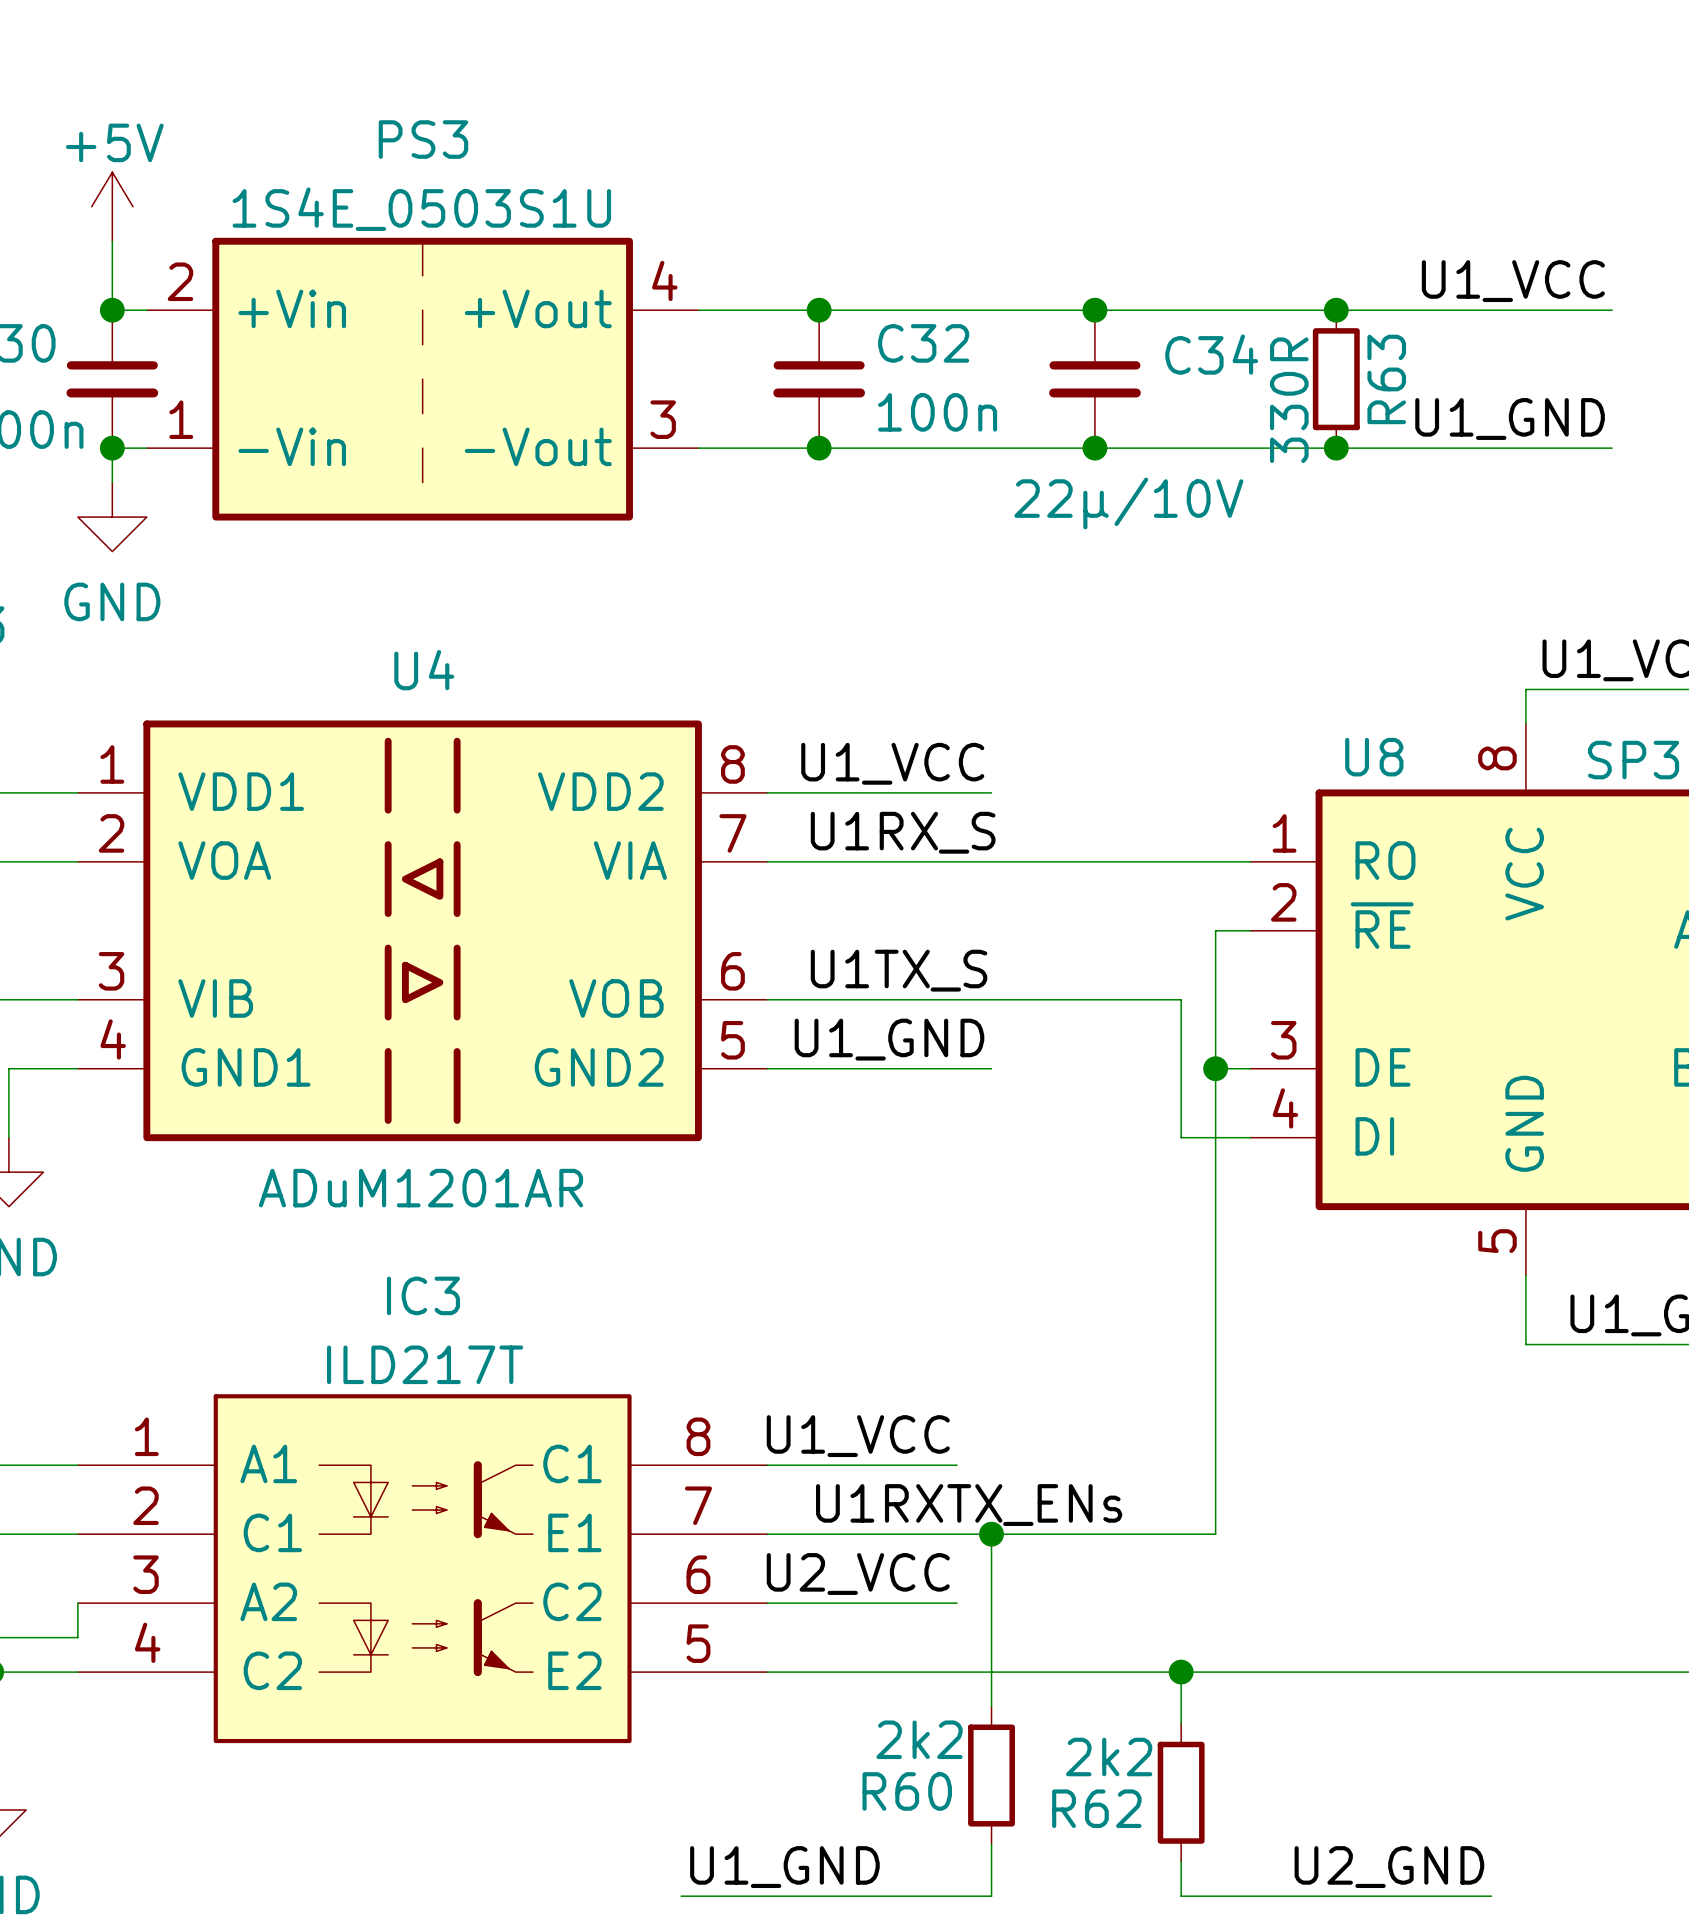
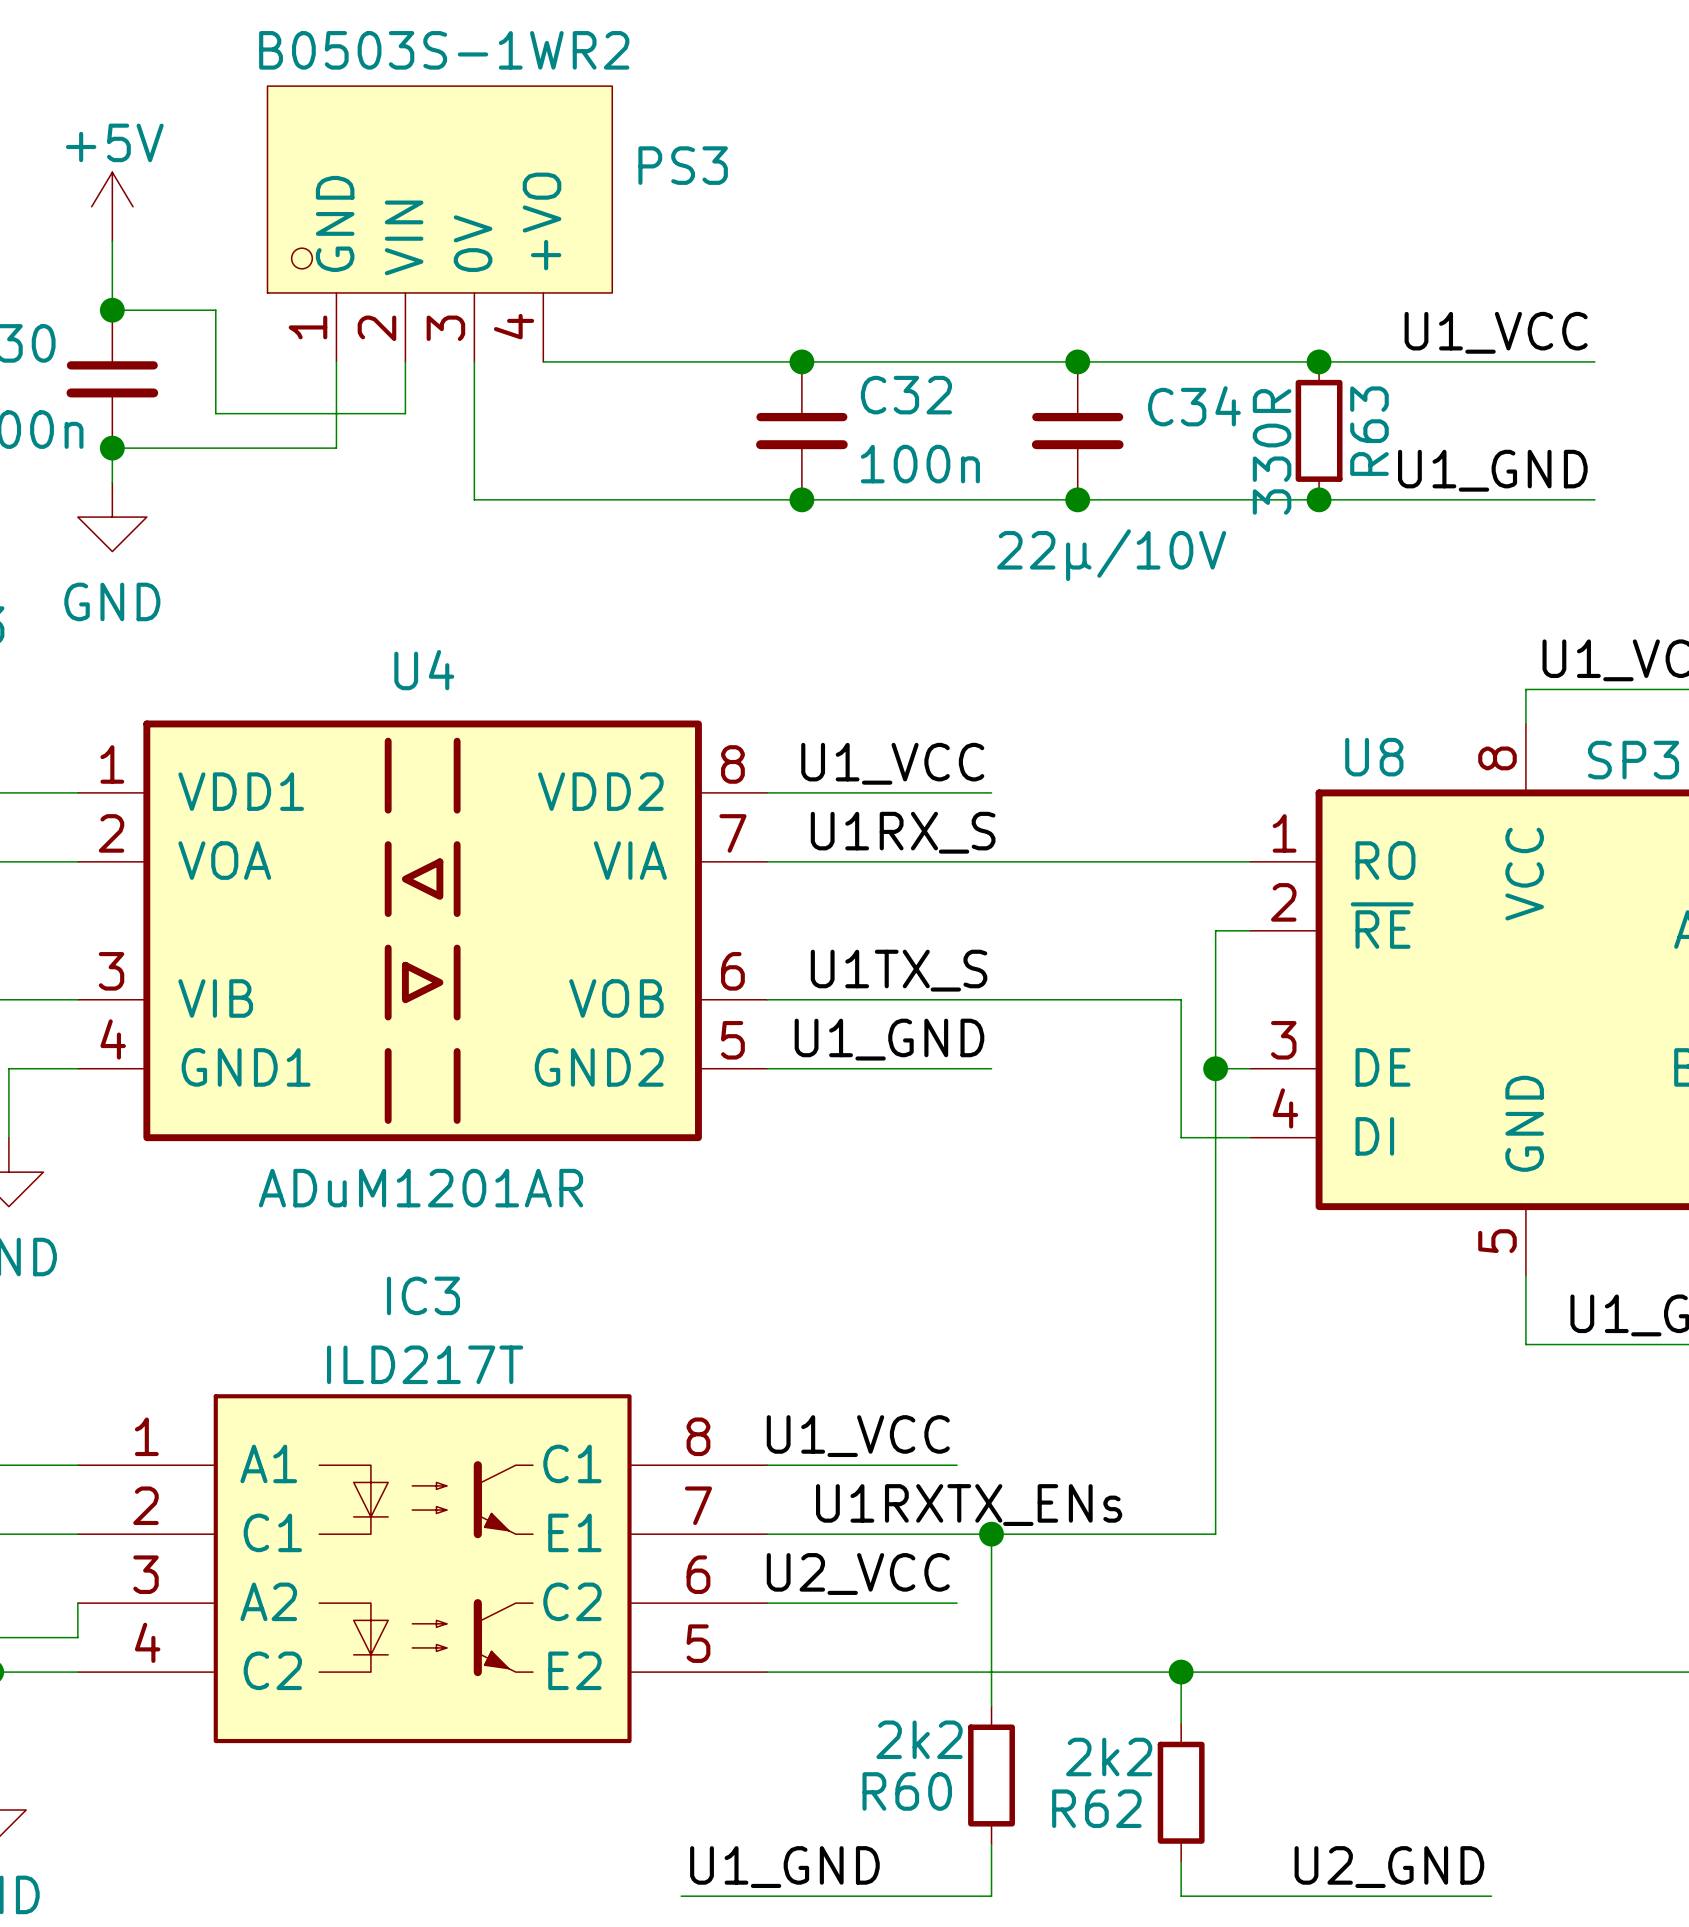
PS3 name position: PS3 (423, 139) -> PS3 (683, 165)
PS3 value: 1S4E_0503S1U (421, 209) -> B0503S-1WR2 (444, 50)
PS3 symbol: [146, 237, 699, 521] -> [267, 86, 613, 362]
label position: U1_VCC (1513, 281) -> U1_VCC (1496, 332)
wire: (698, 310) (1612, 310) -> none
junction: (819, 310) -> none
junction: (1094, 310) -> none
junction: (1336, 310) -> none
wire: none -> (474, 361) (474, 499) (1594, 499)
wire: none -> (543, 361) (1594, 361)
junction: none -> (801, 361)
junction: none -> (1077, 361)
junction: none -> (1319, 361)
C32 position: (819, 379) -> (801, 430)
C34 position: (1094, 379) -> (1077, 430)
R63 position: (1336, 379) -> (1319, 430)
label position: U1_GND (1510, 419) -> U1_GND (1492, 470)
wire: (698, 448) (1612, 448) -> none
junction: (819, 448) -> none
junction: (1094, 448) -> none
junction: (1336, 448) -> none
junction: none -> (801, 499)
junction: none -> (1077, 499)
junction: none -> (1319, 499)

